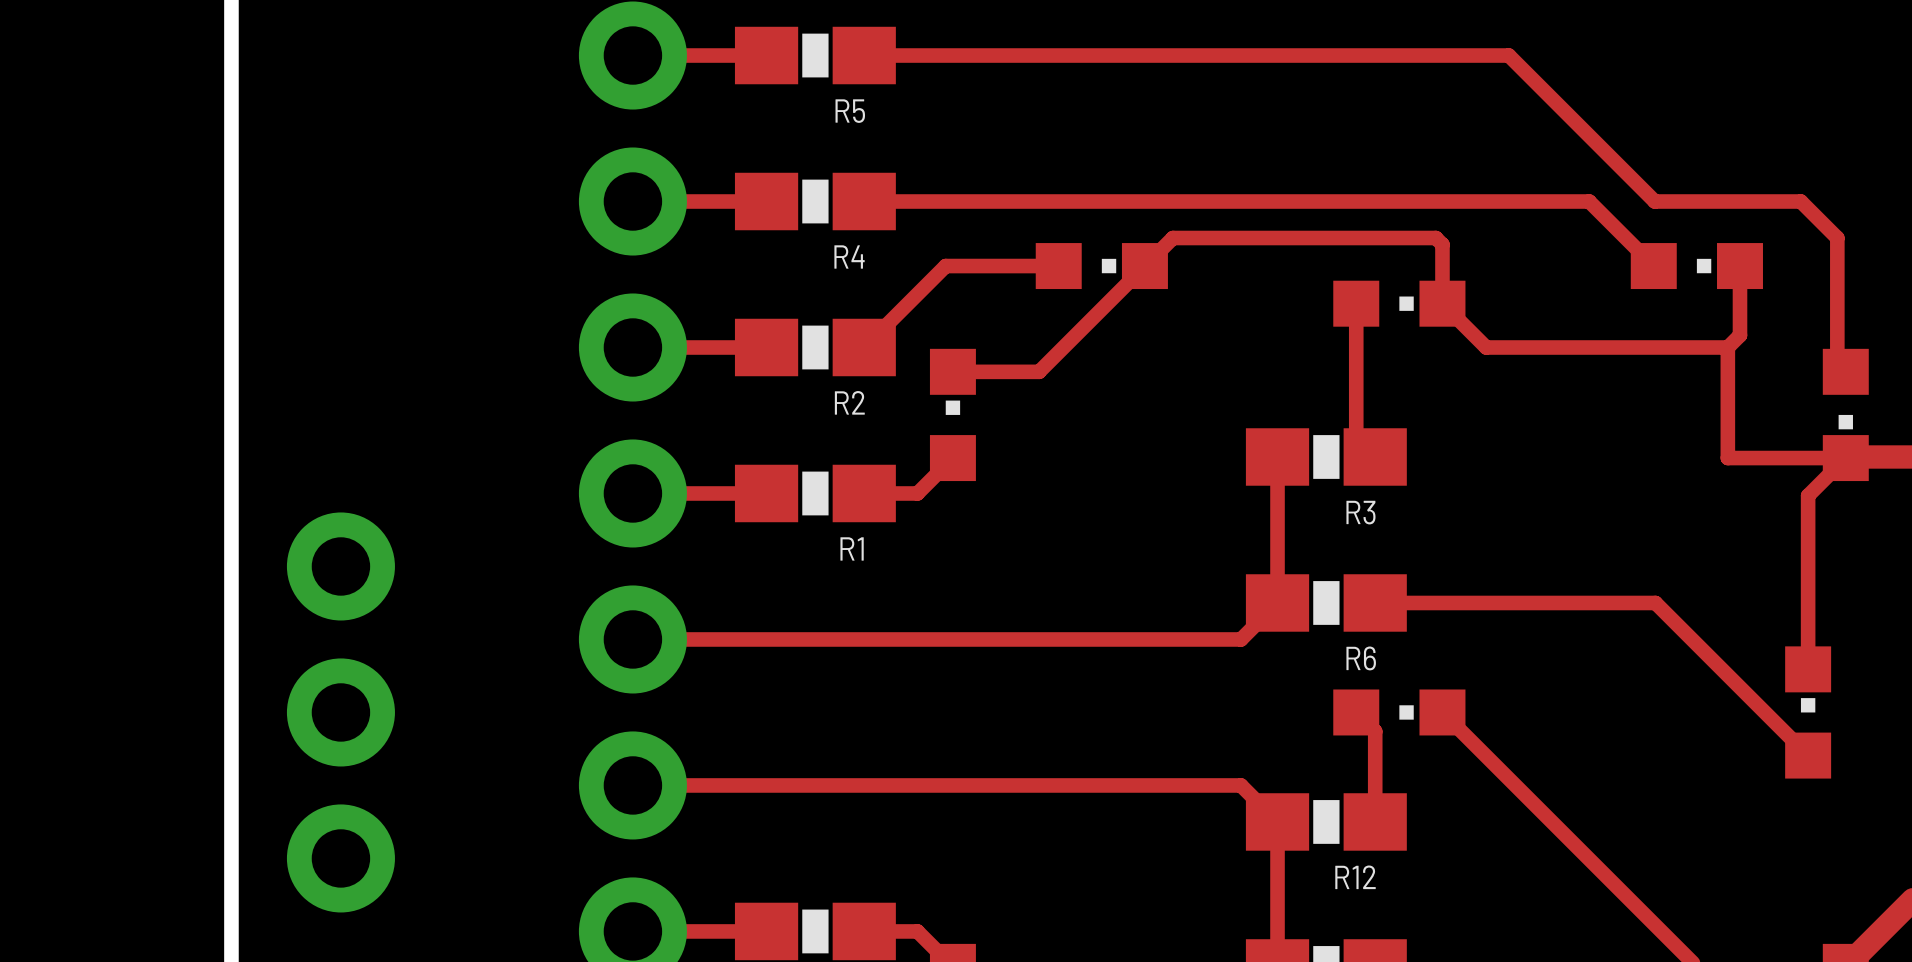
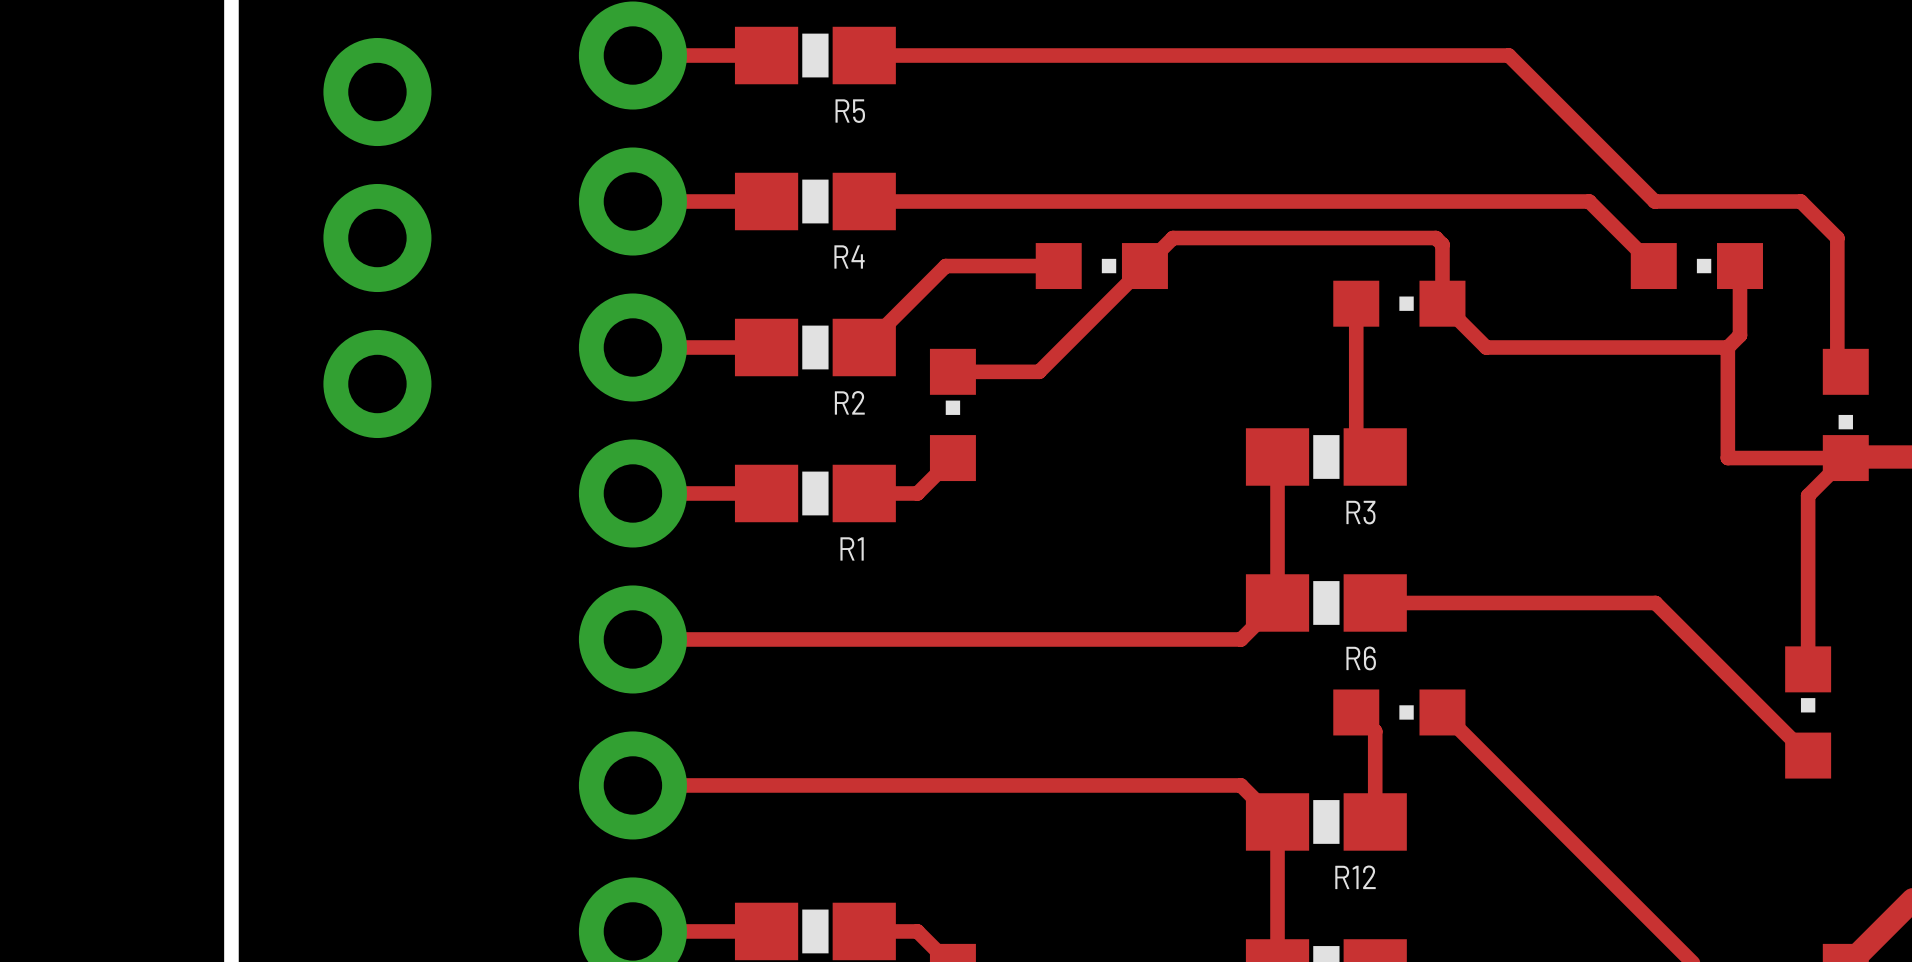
part position: (340, 712) -> (377, 238)

